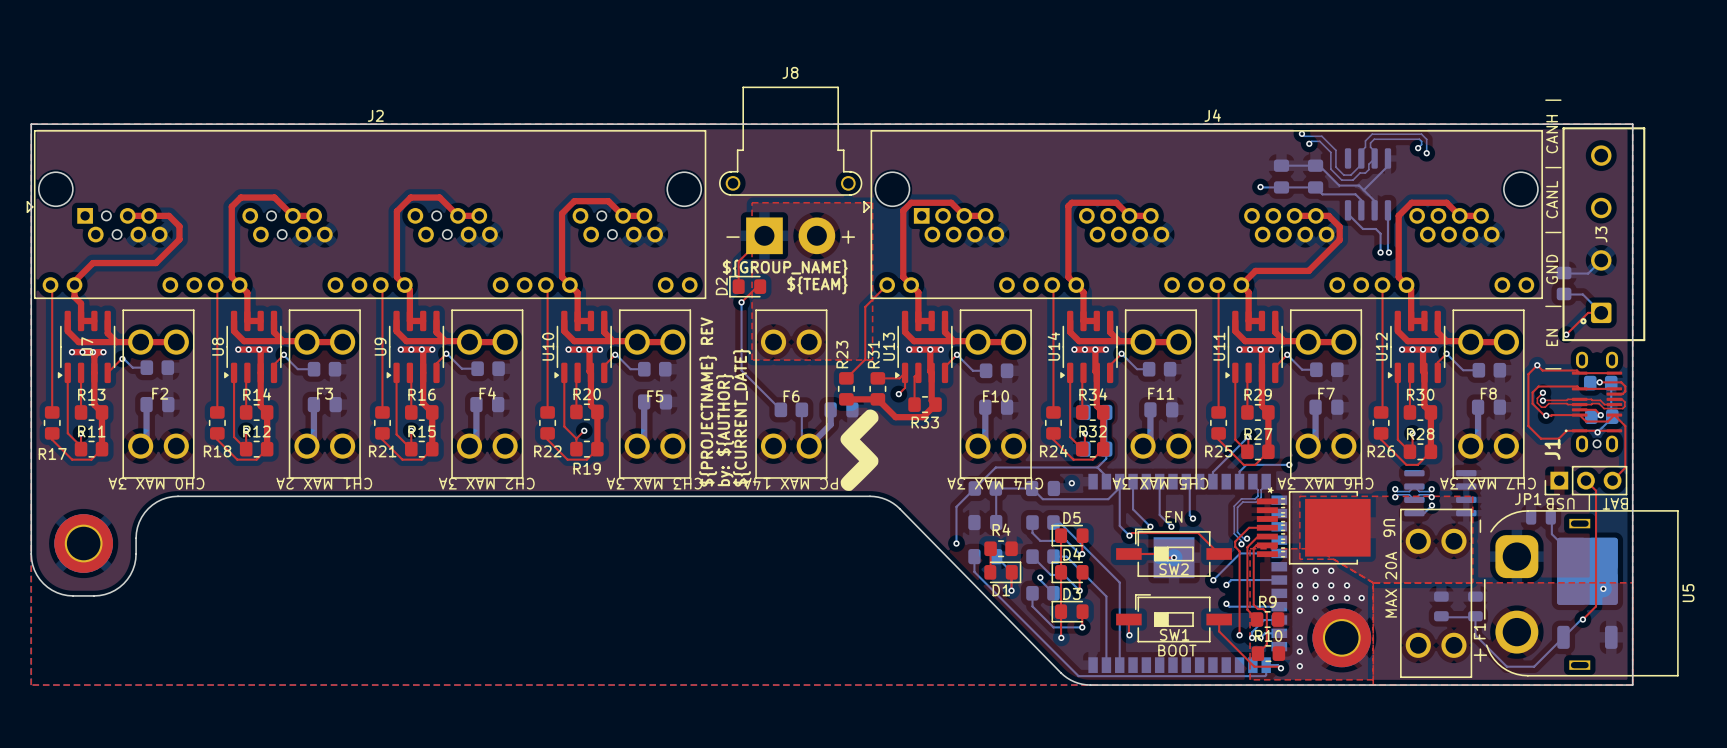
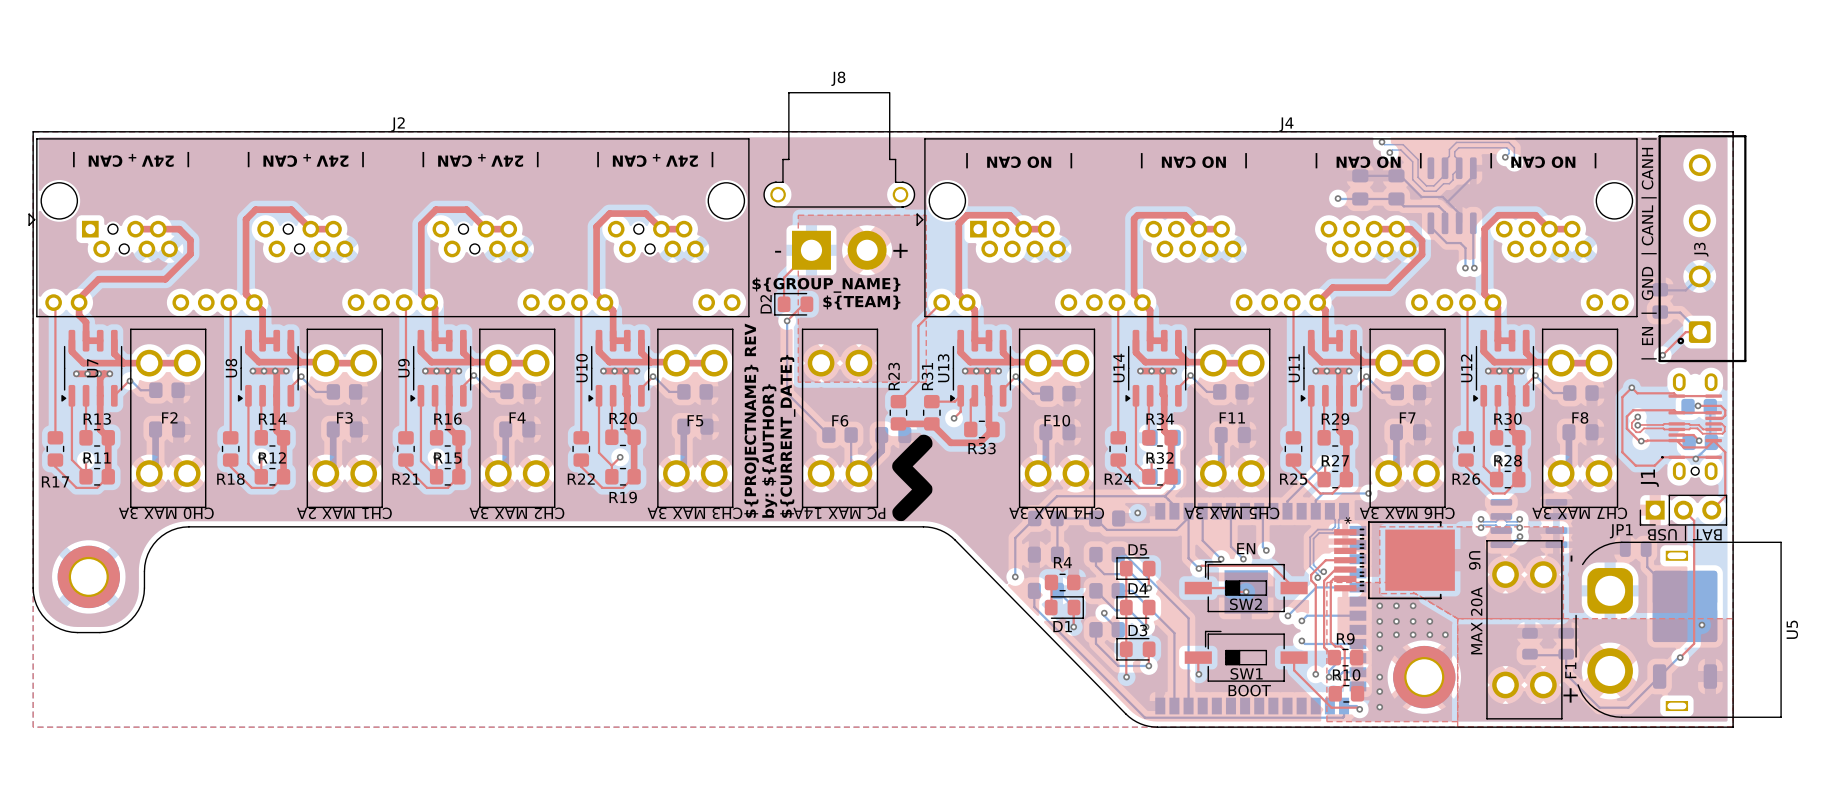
text: none -> | 24V + CAN | (131, 159)
text: none -> | 24V + CAN | (305, 159)
text: none -> | 24V + CAN | (480, 159)
text: none -> | 24V + CAN | (655, 159)
text: none -> | NO CAN | (1019, 160)
text: none -> | NO CAN | (1193, 160)
text: none -> | NO CAN | (1368, 160)
text: none -> | NO CAN | (1543, 160)

